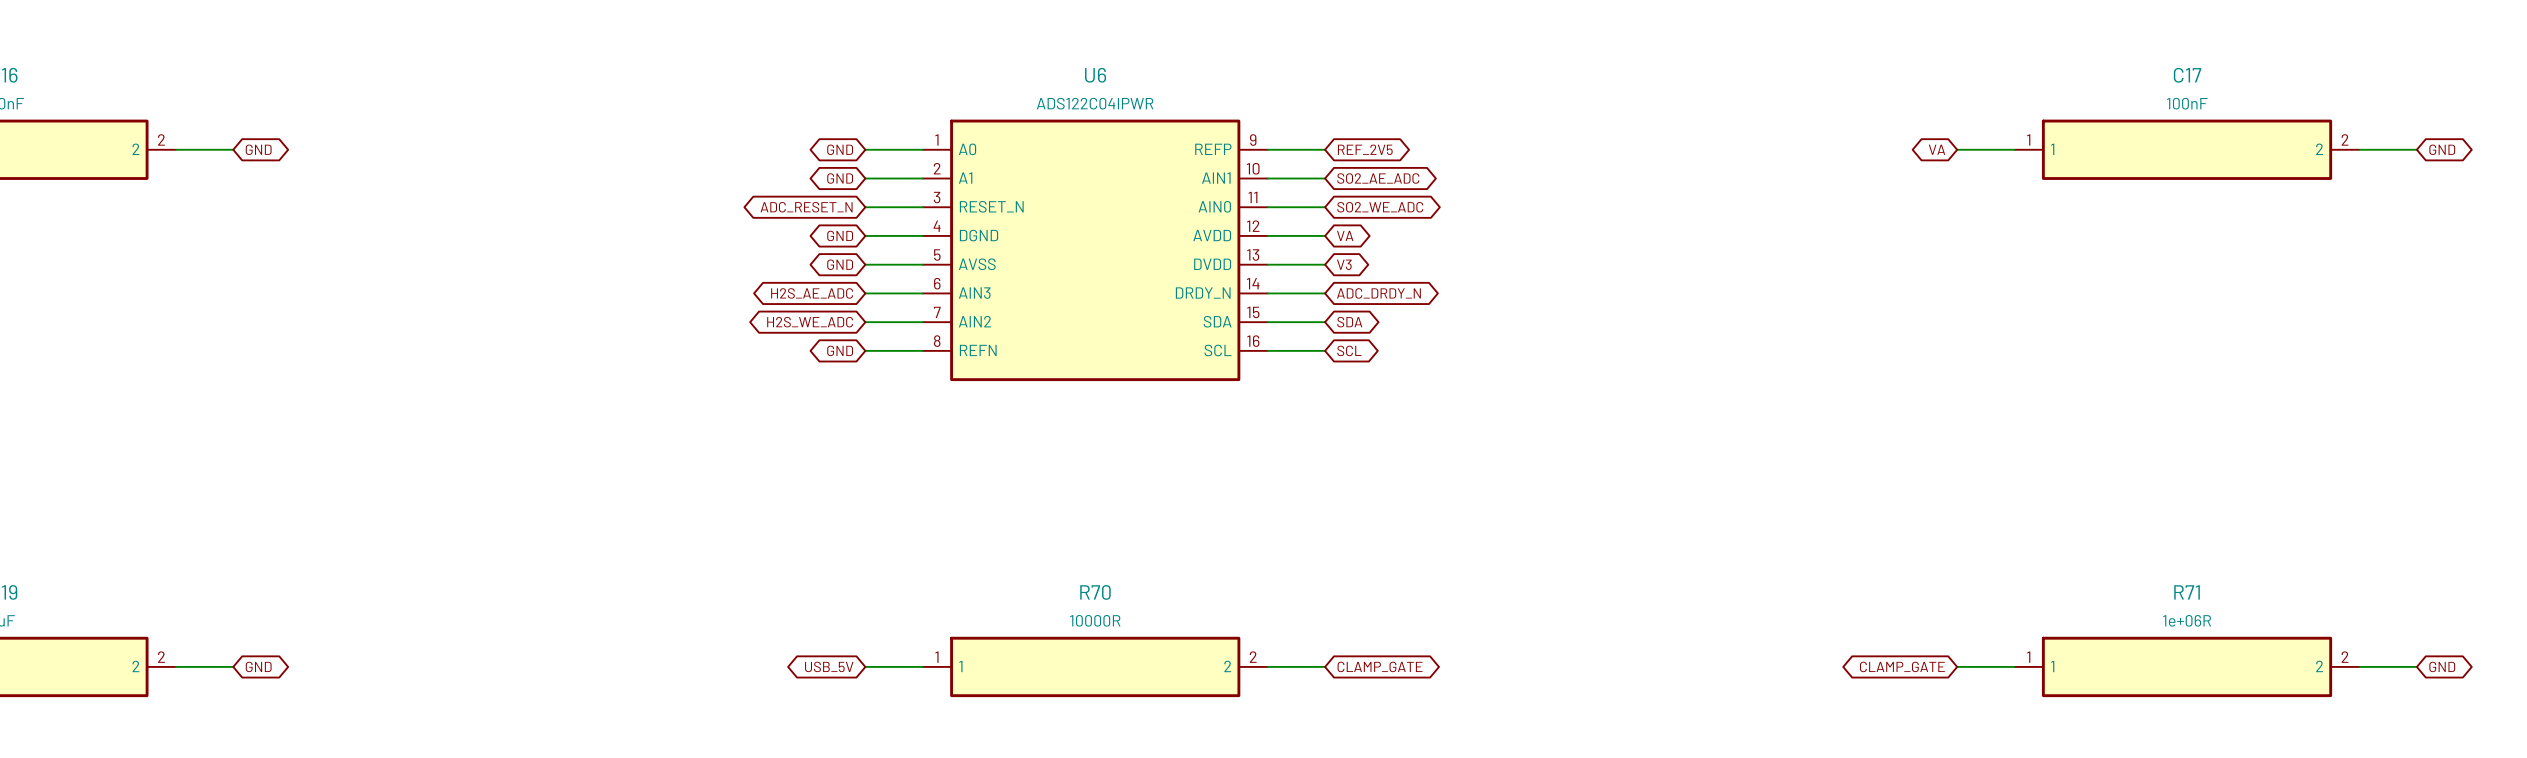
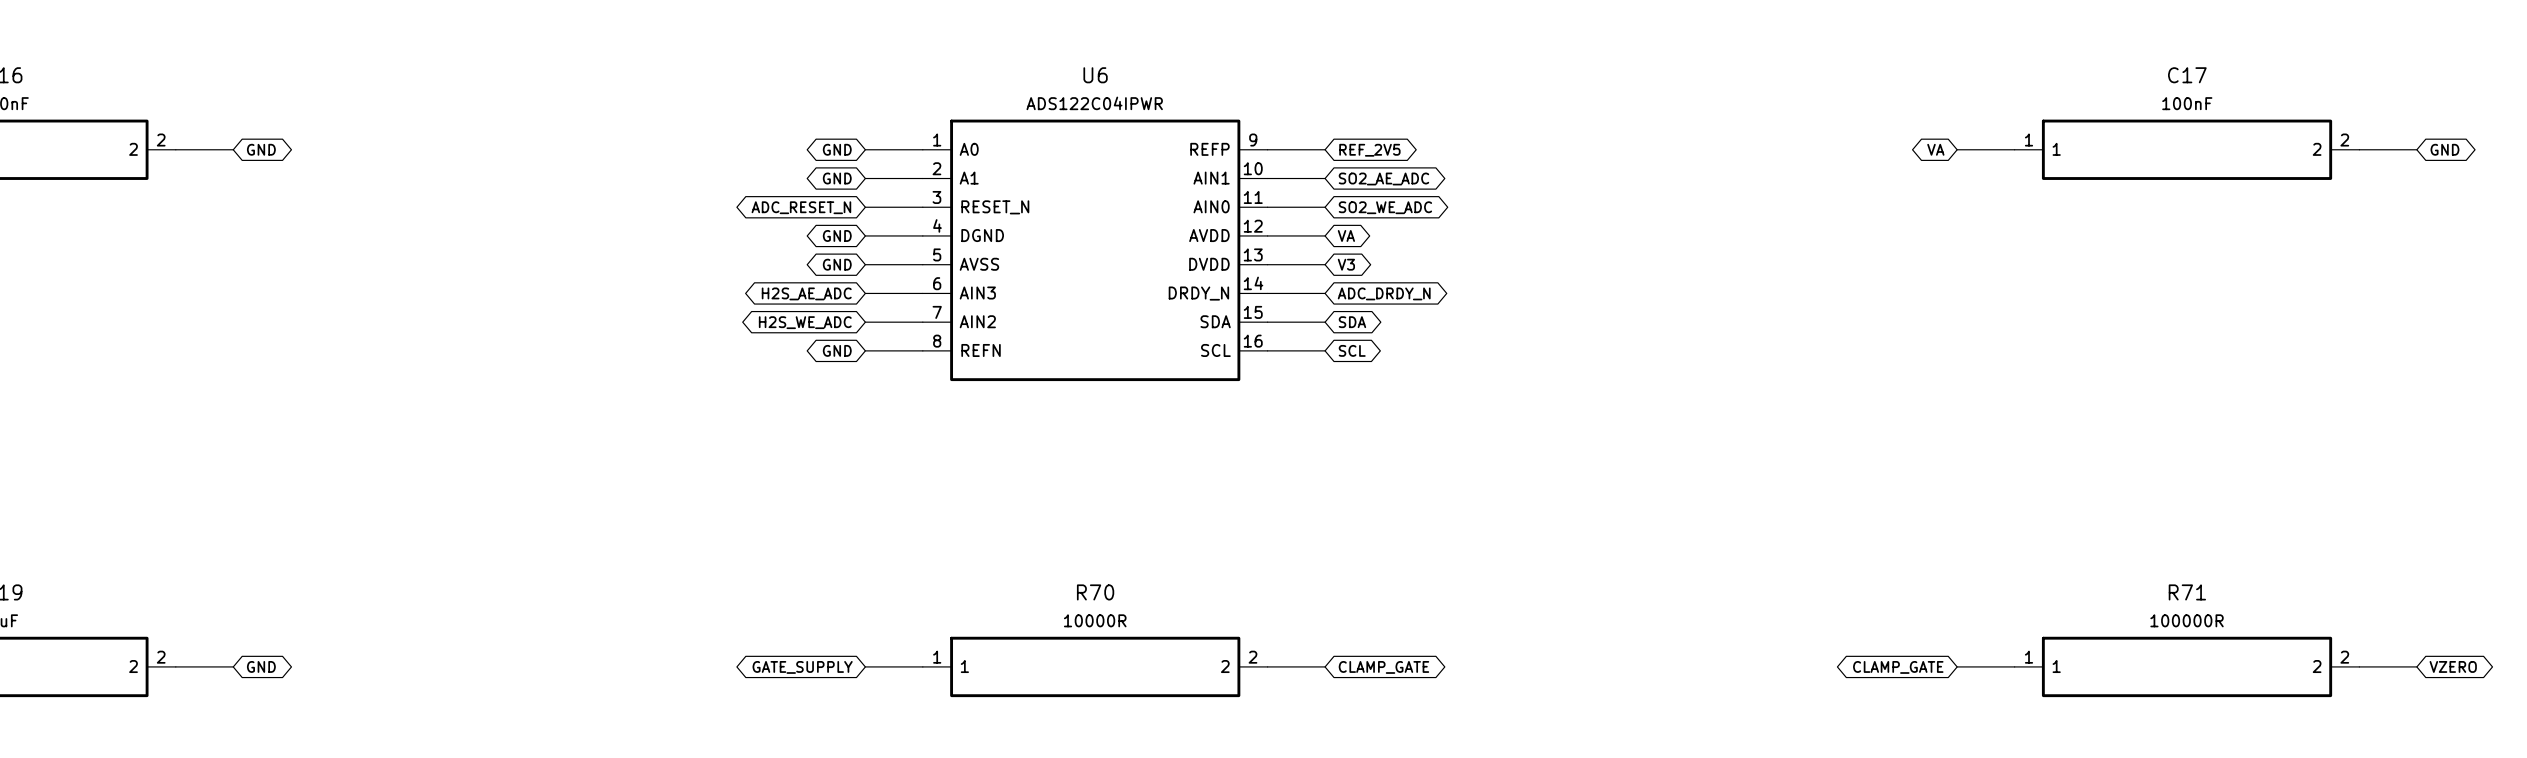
R71 value: 1e+06R (2187, 620) -> 100000R (2187, 620)
global label: USB_5V (829, 666) -> GATE_SUPPLY (802, 667)
global label: GND (2442, 666) -> VZERO (2453, 666)

